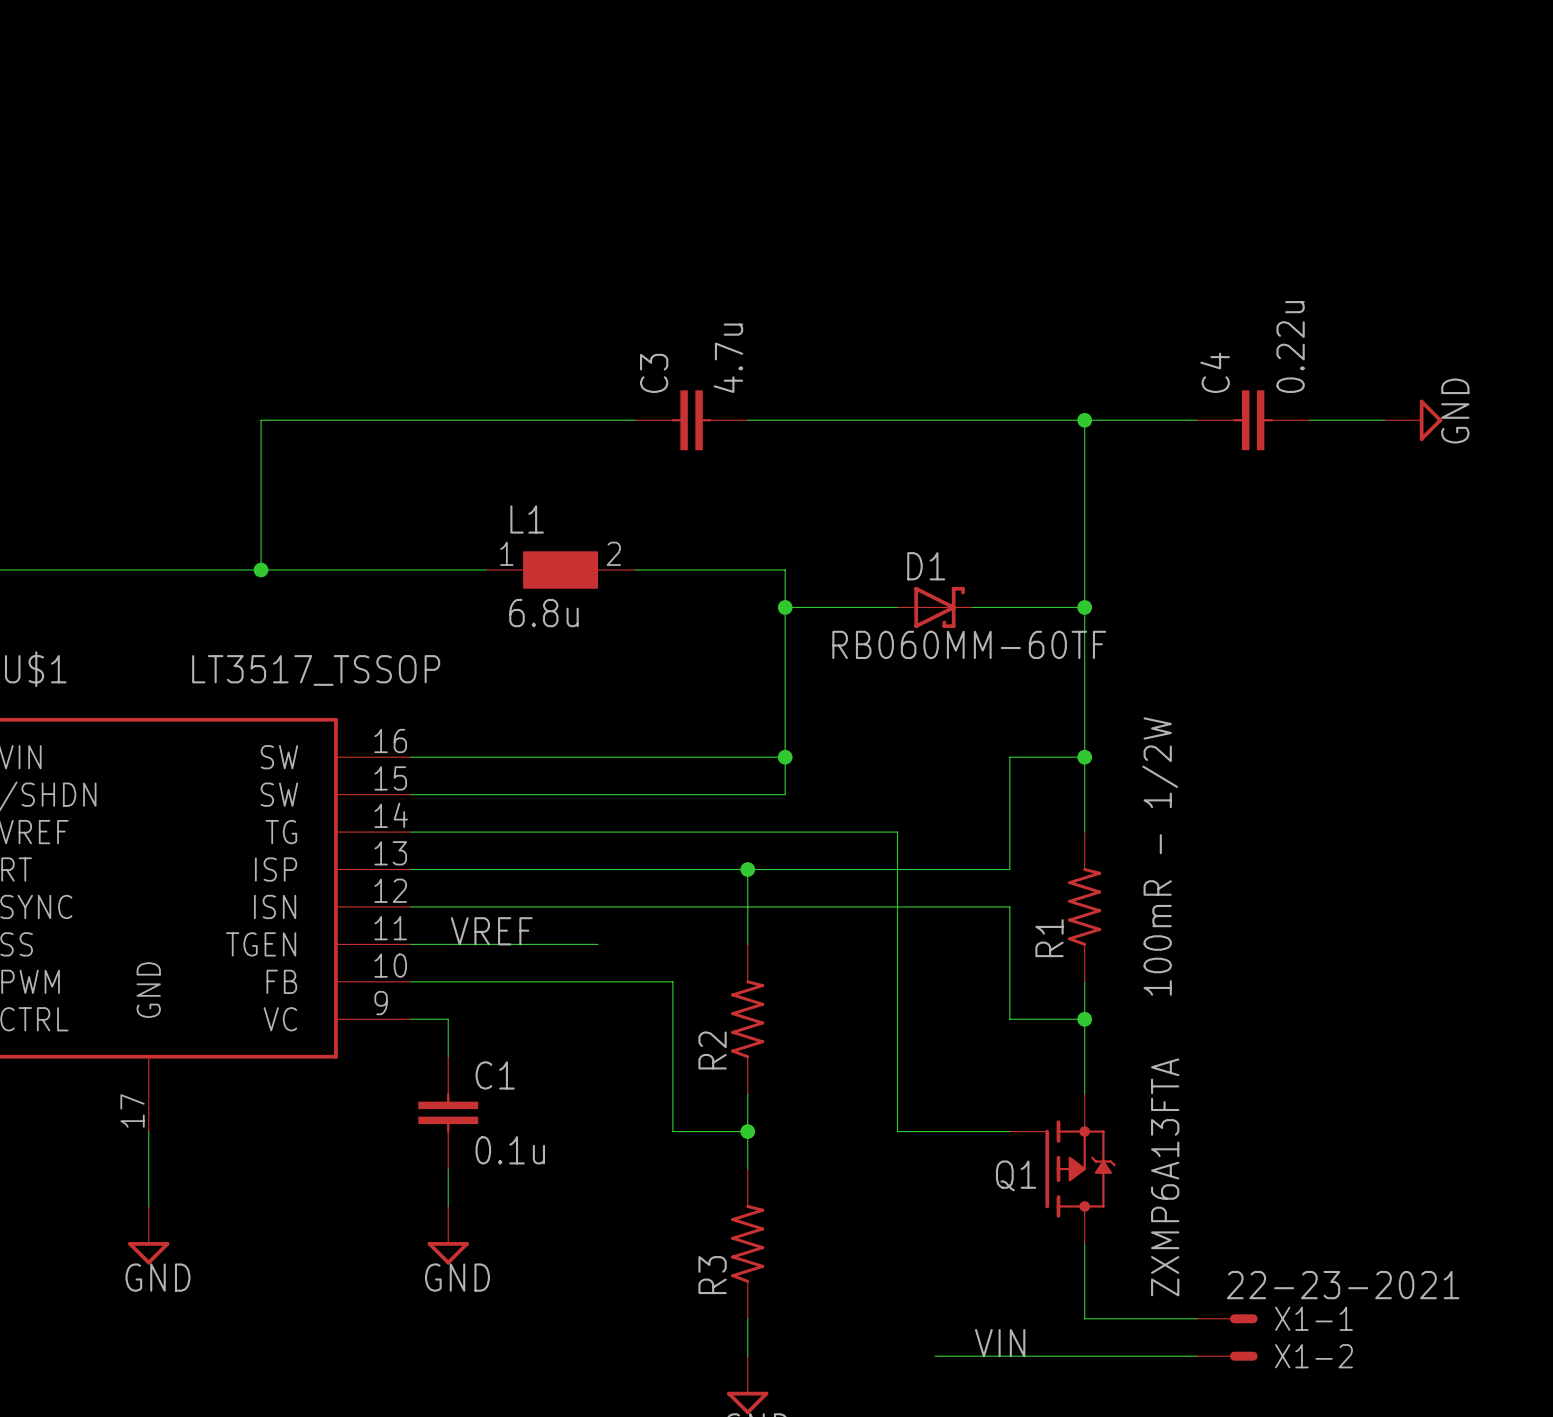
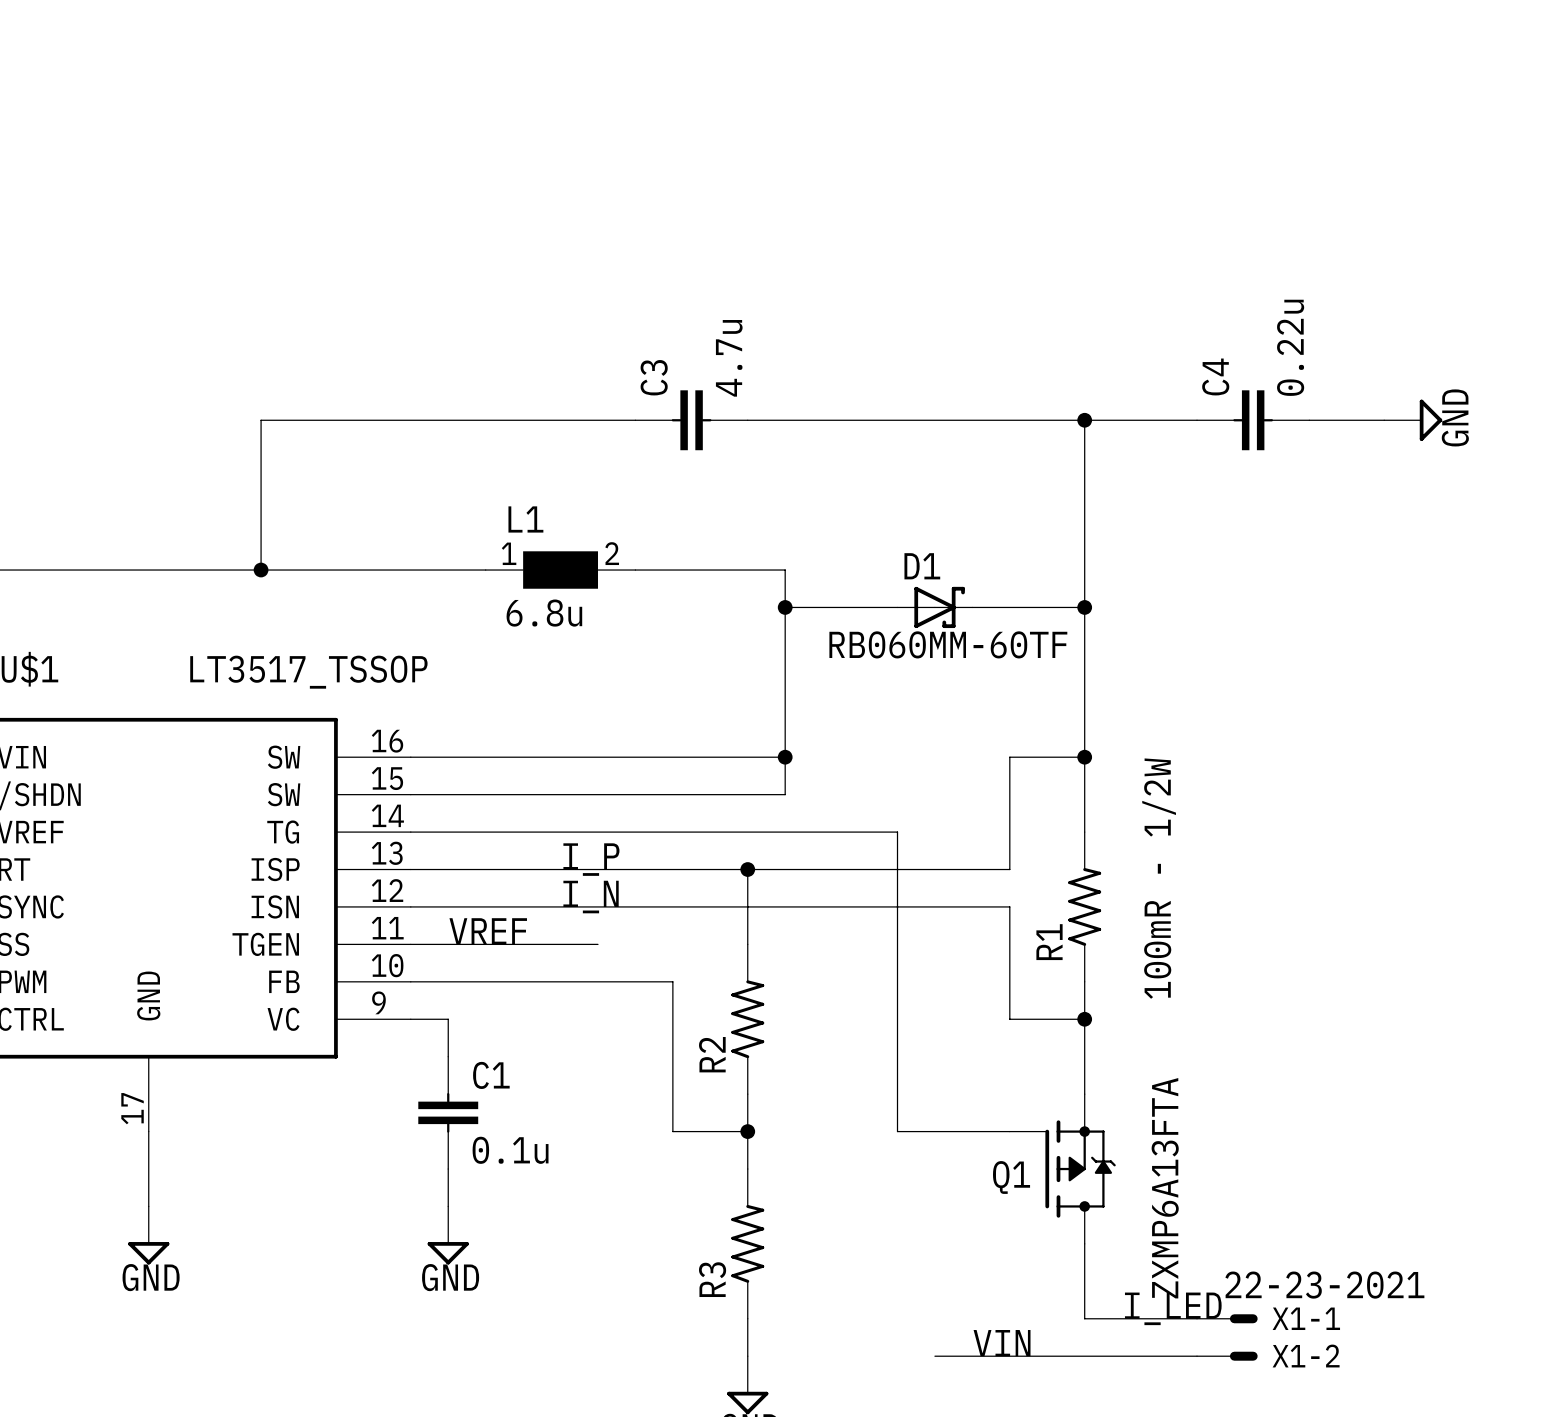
label: none -> I_P (591, 859)
label: none -> I_N (591, 897)
label: none -> I_LED (1173, 1308)

